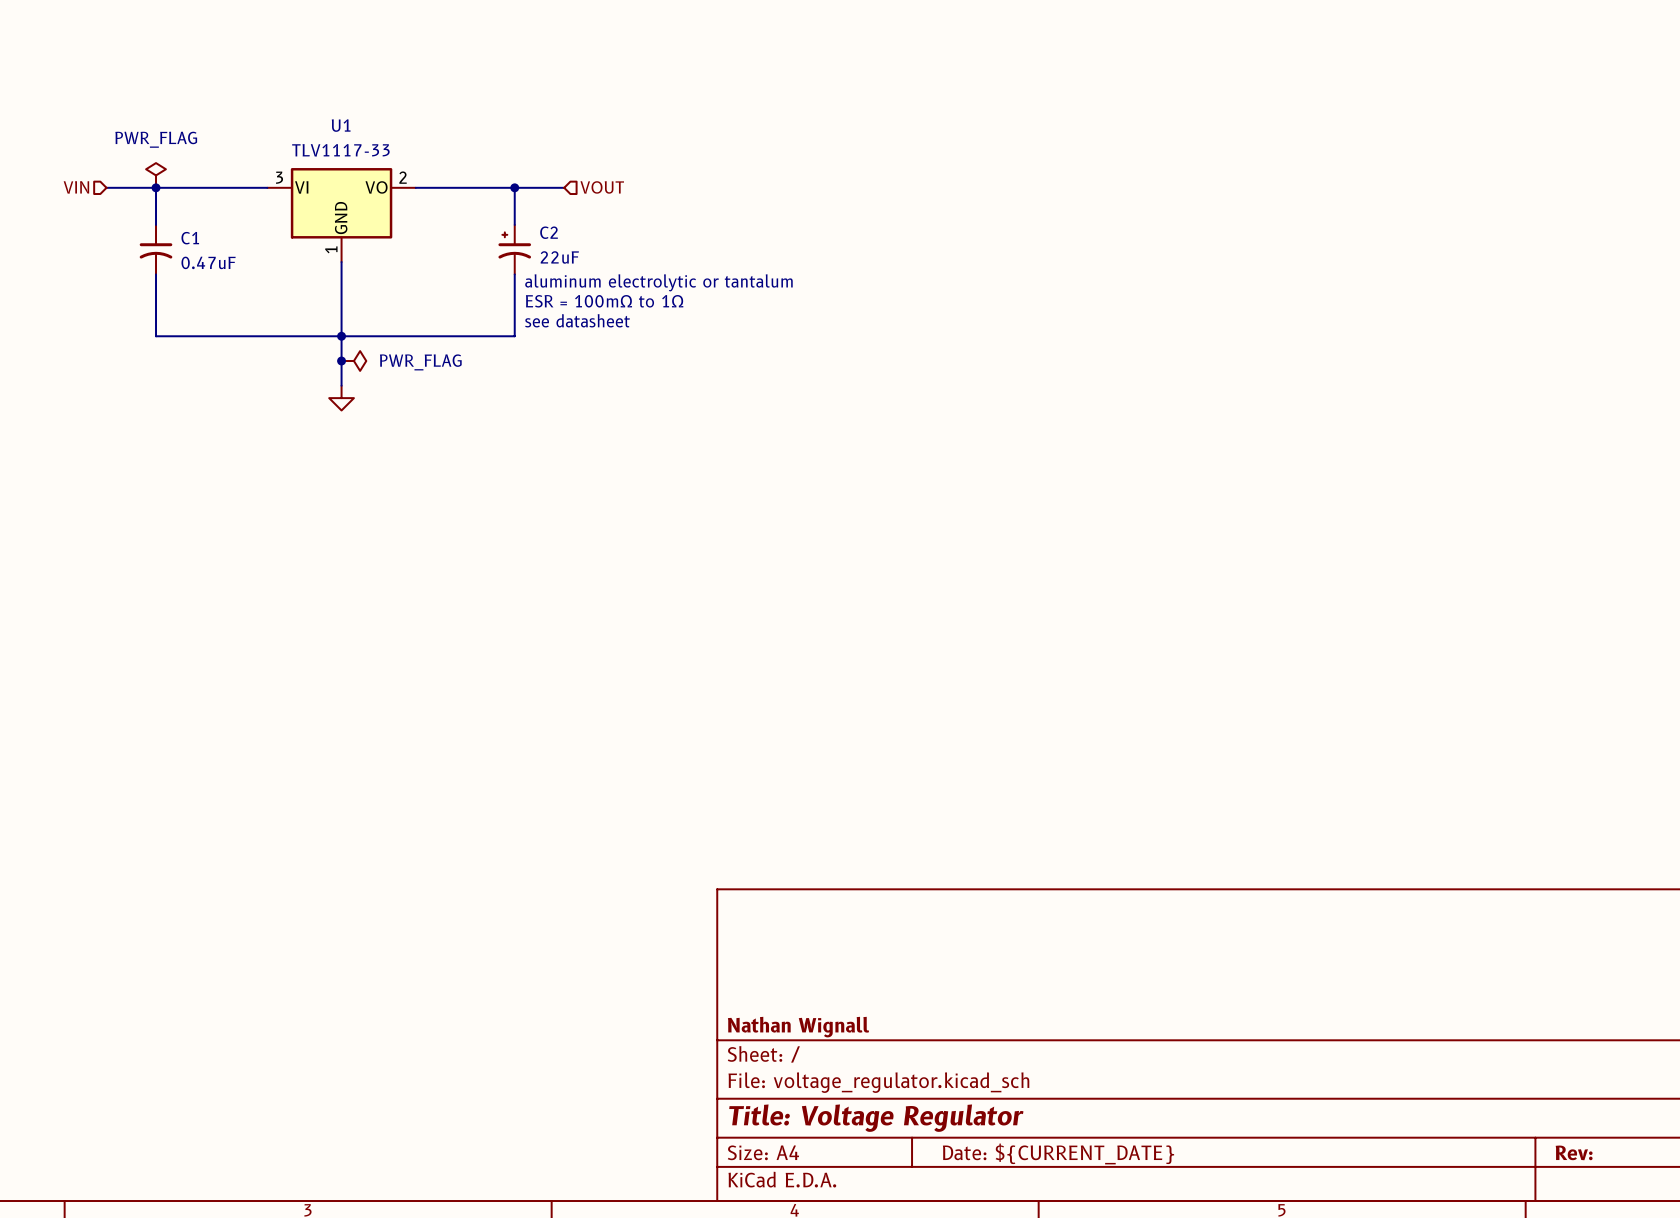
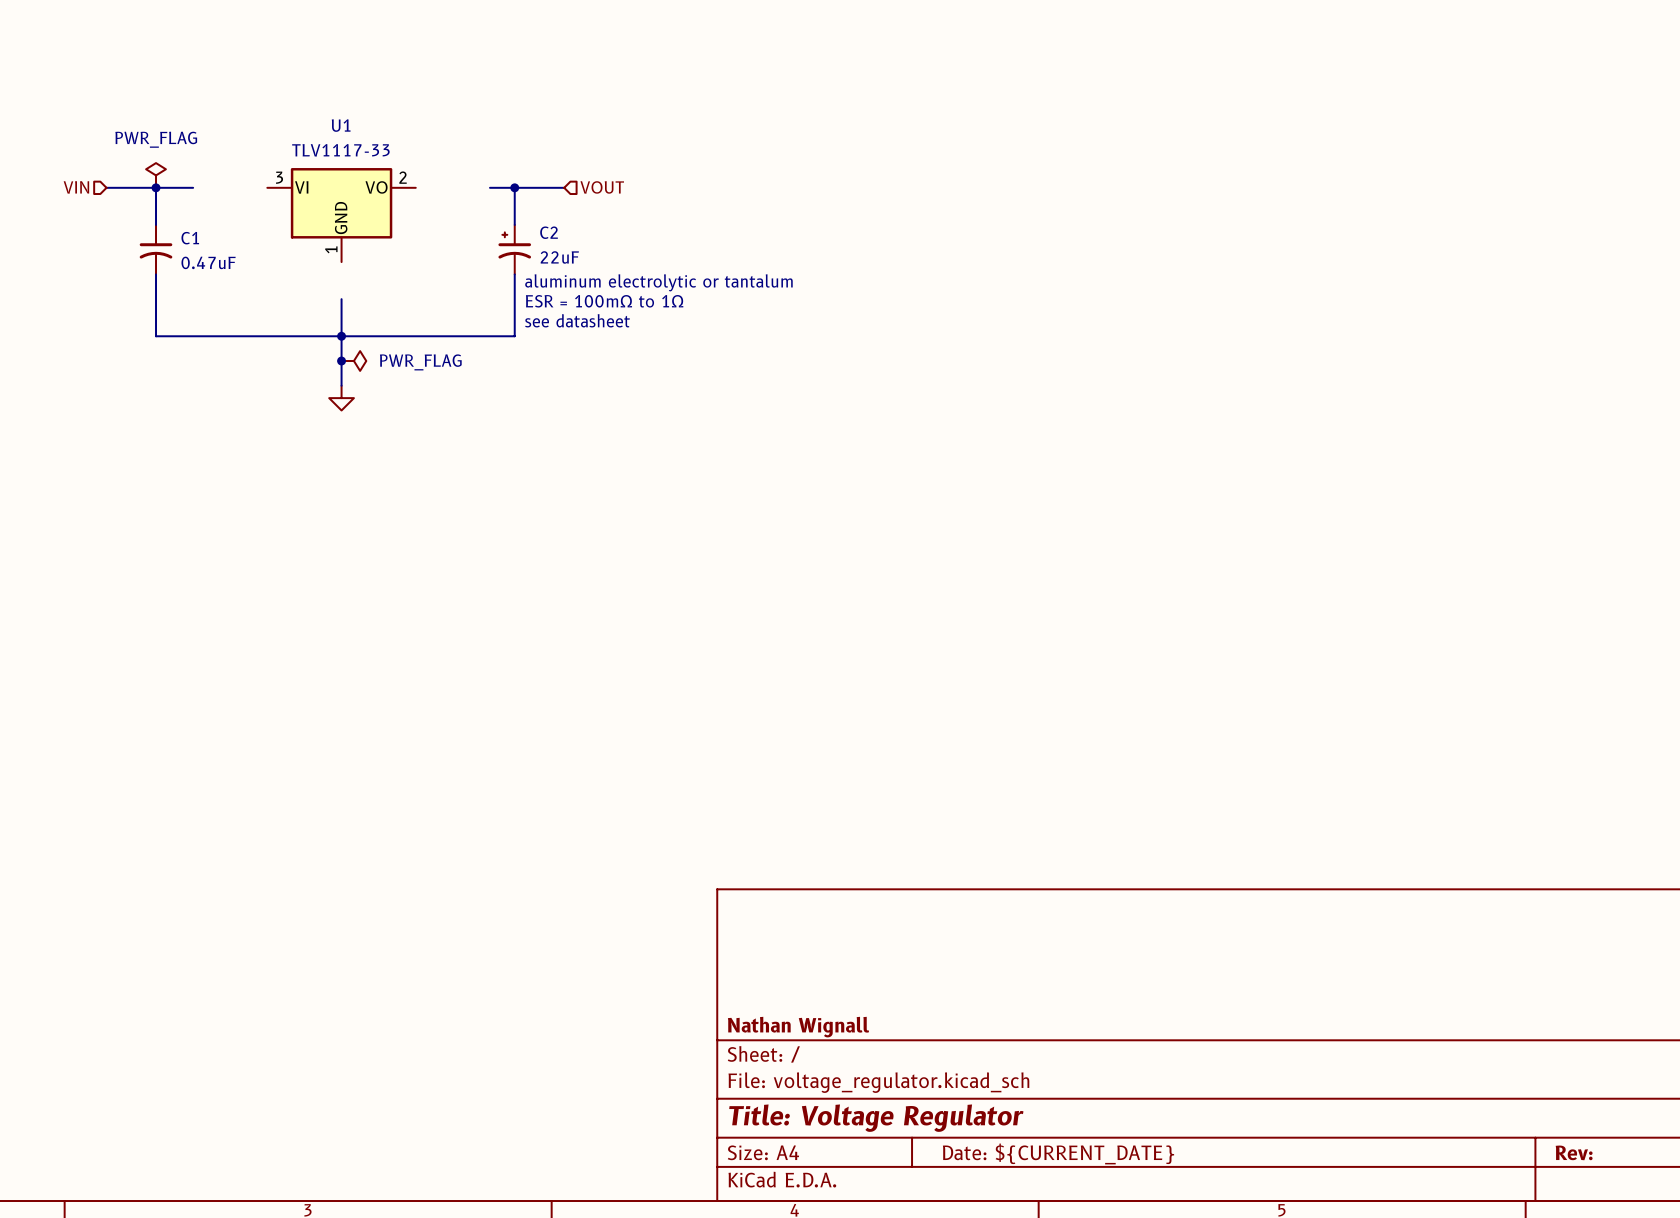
wire: (193, 187) (267, 187) -> none
wire: (415, 187) (490, 187) -> none
wire: (341, 262) (341, 299) -> none

